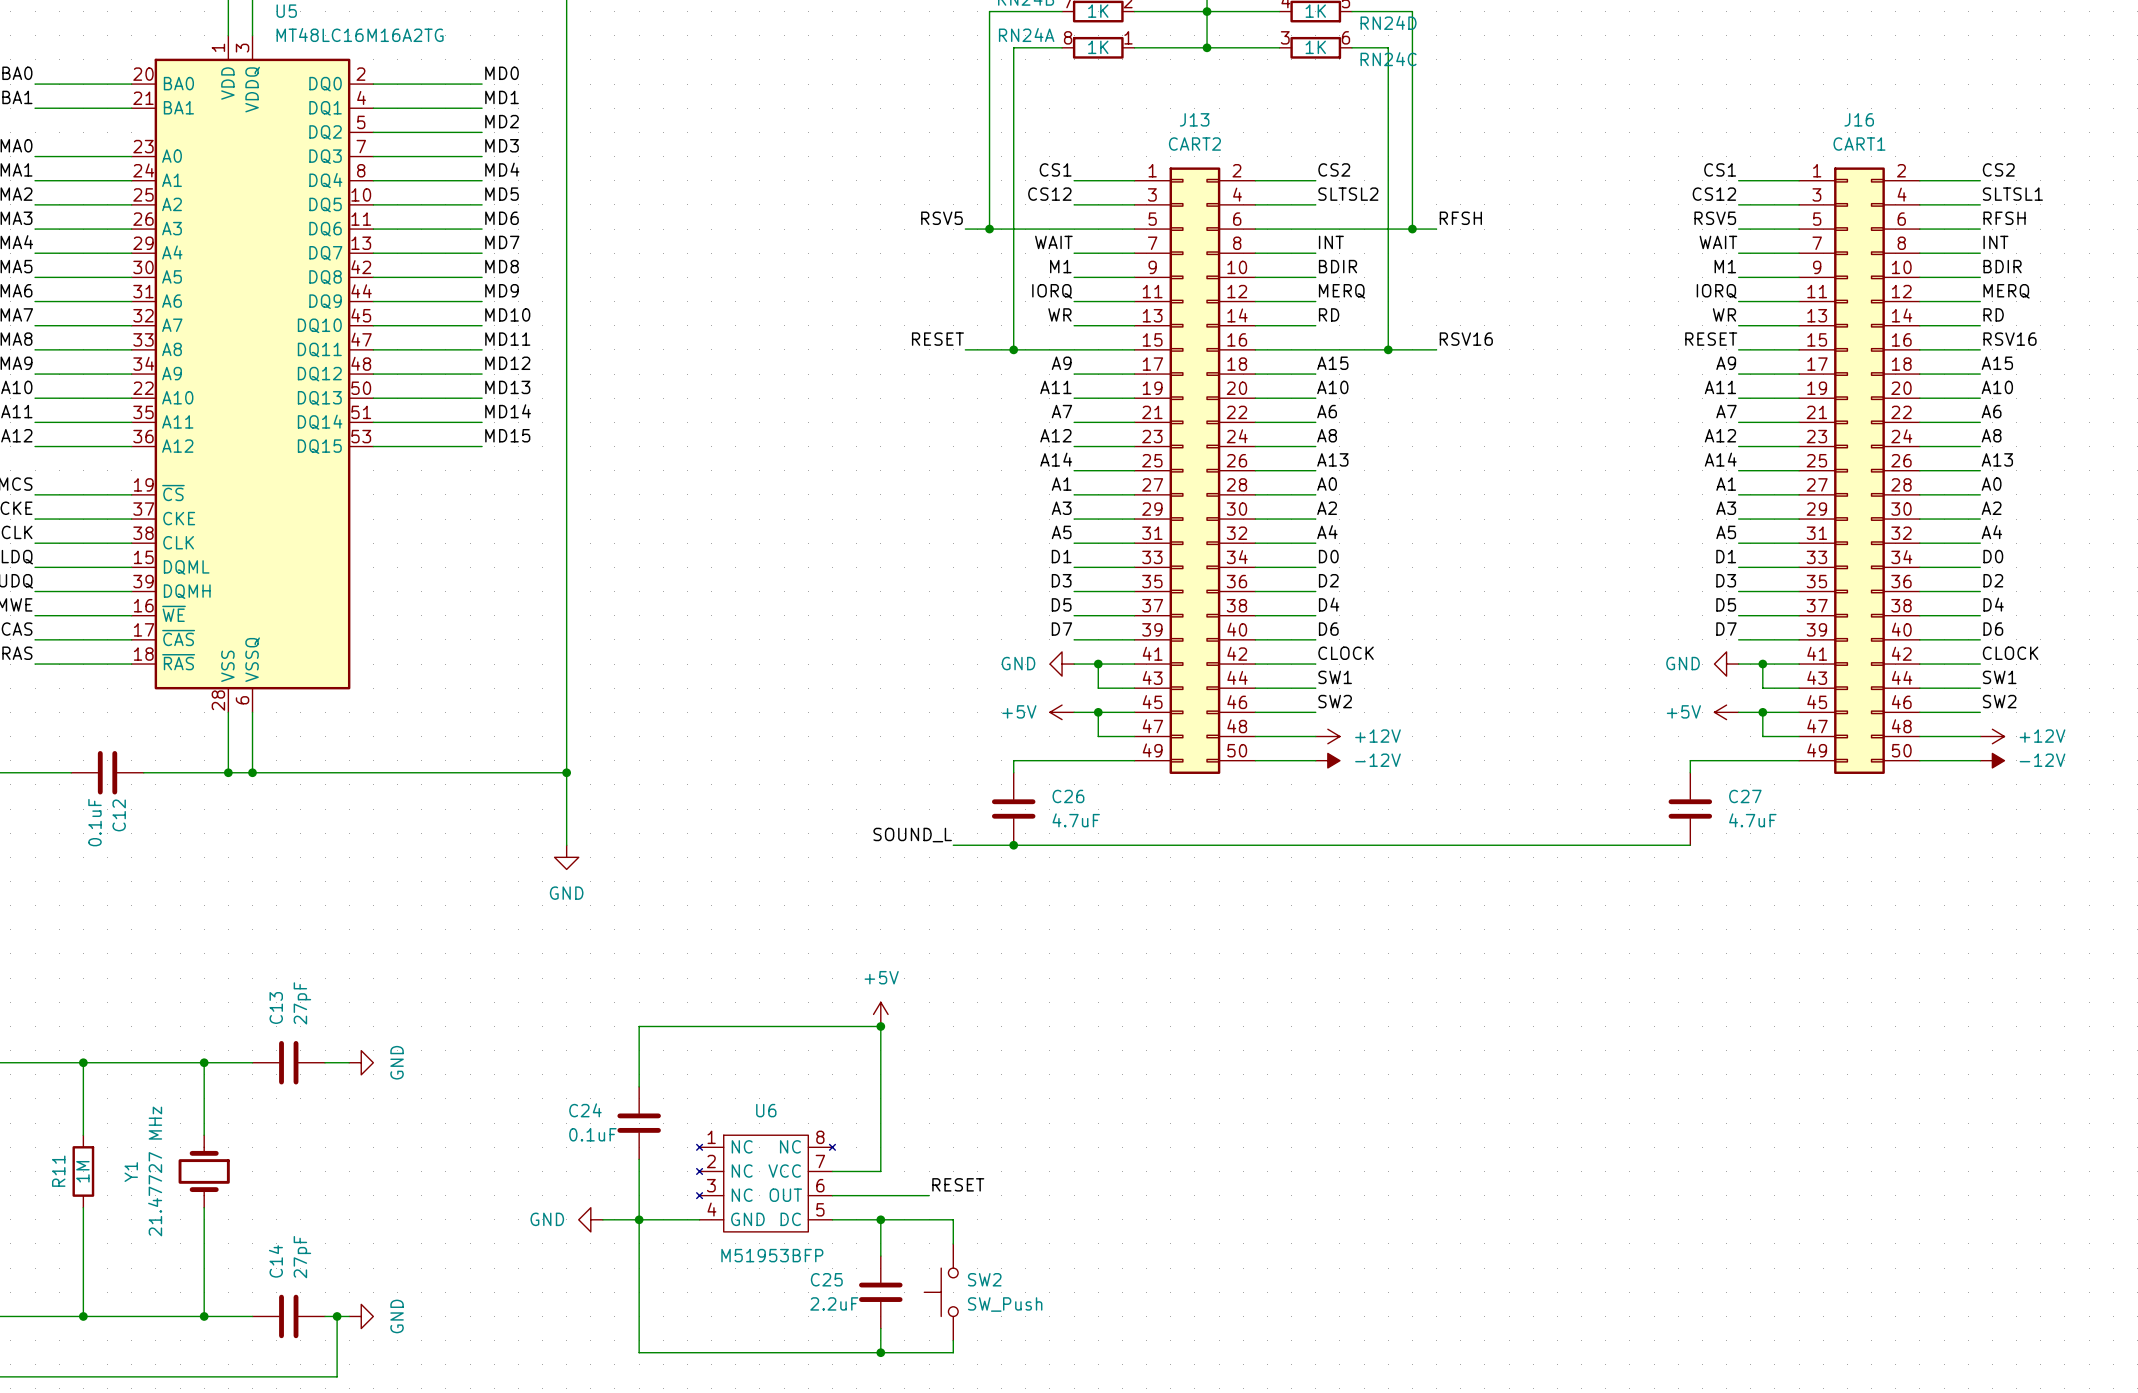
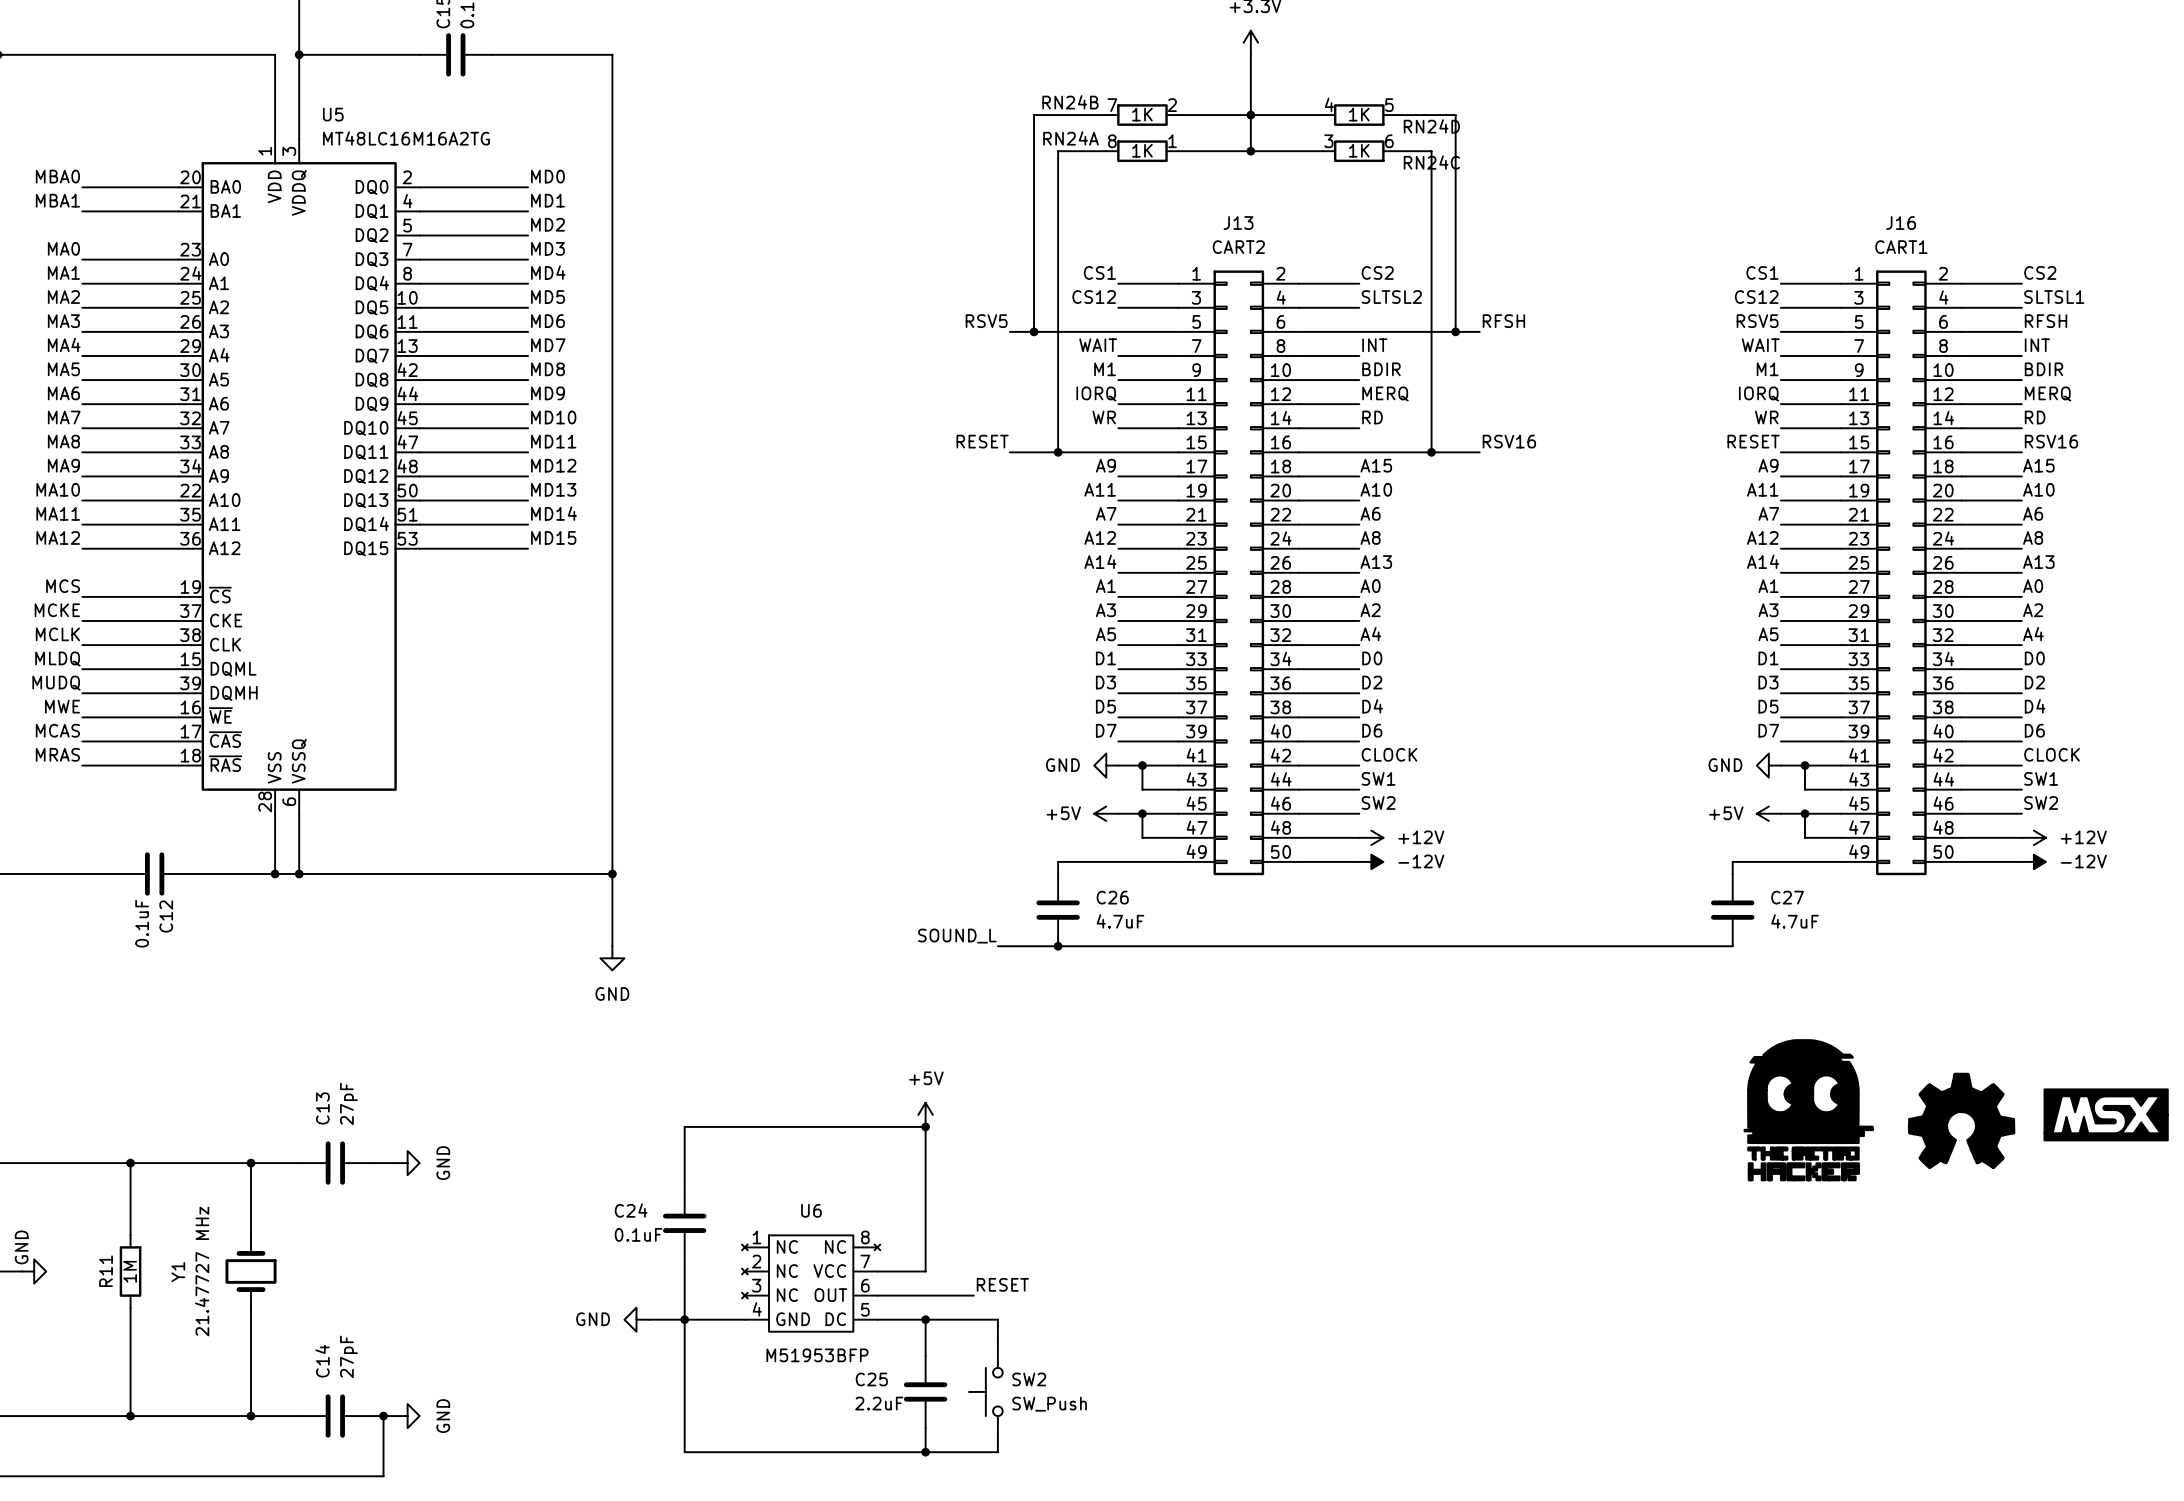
power symbol: none -> (1808, 1110)
power symbol: none -> (2106, 1114)
power symbol: none -> (1961, 1120)

